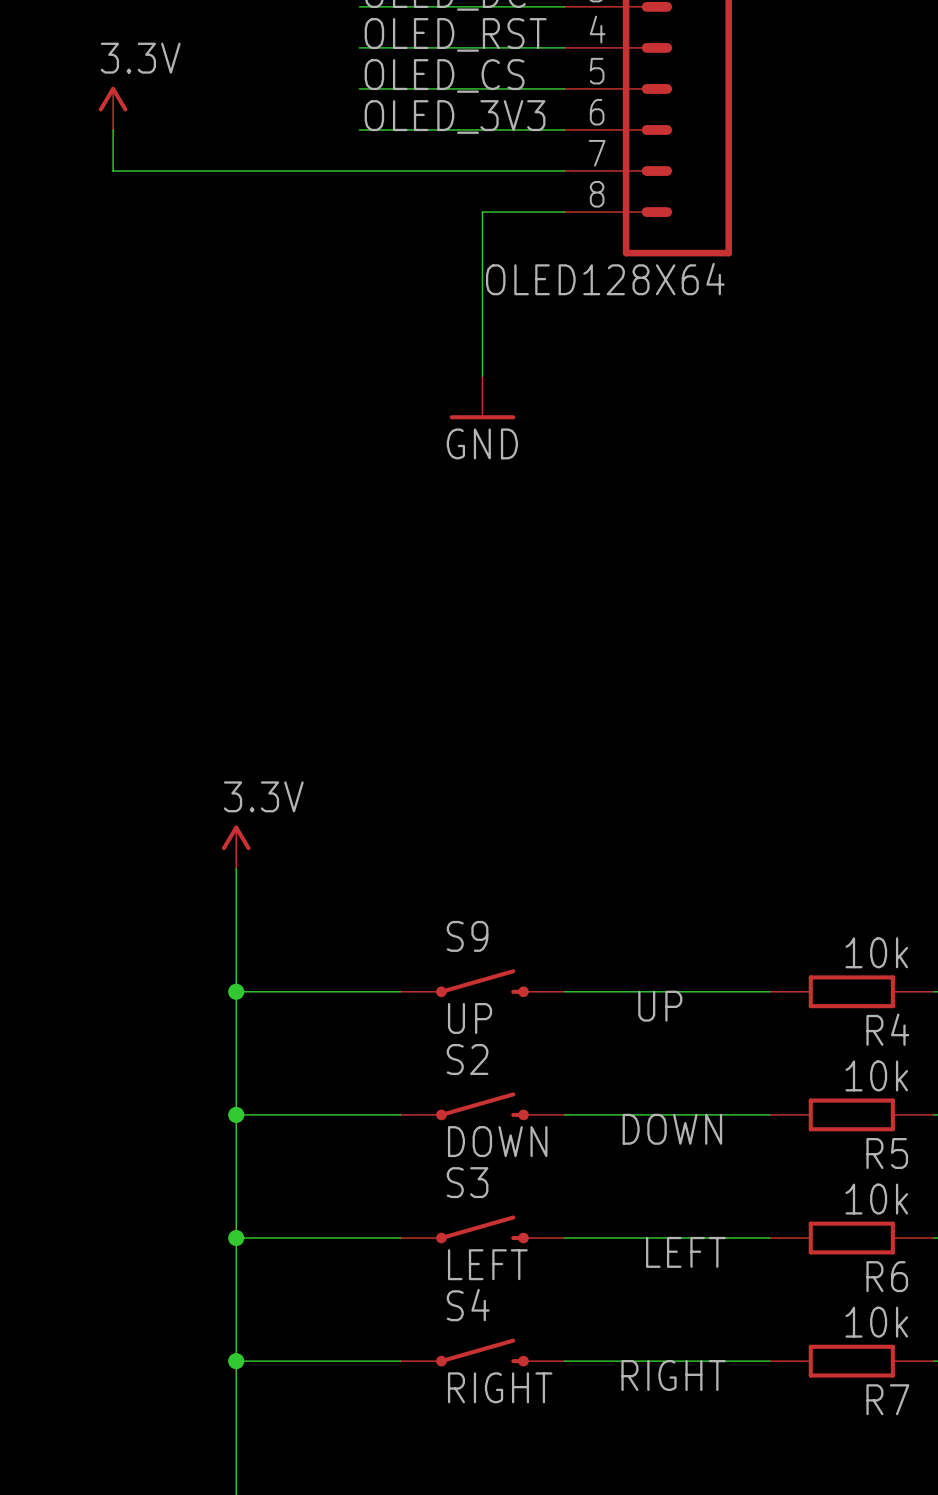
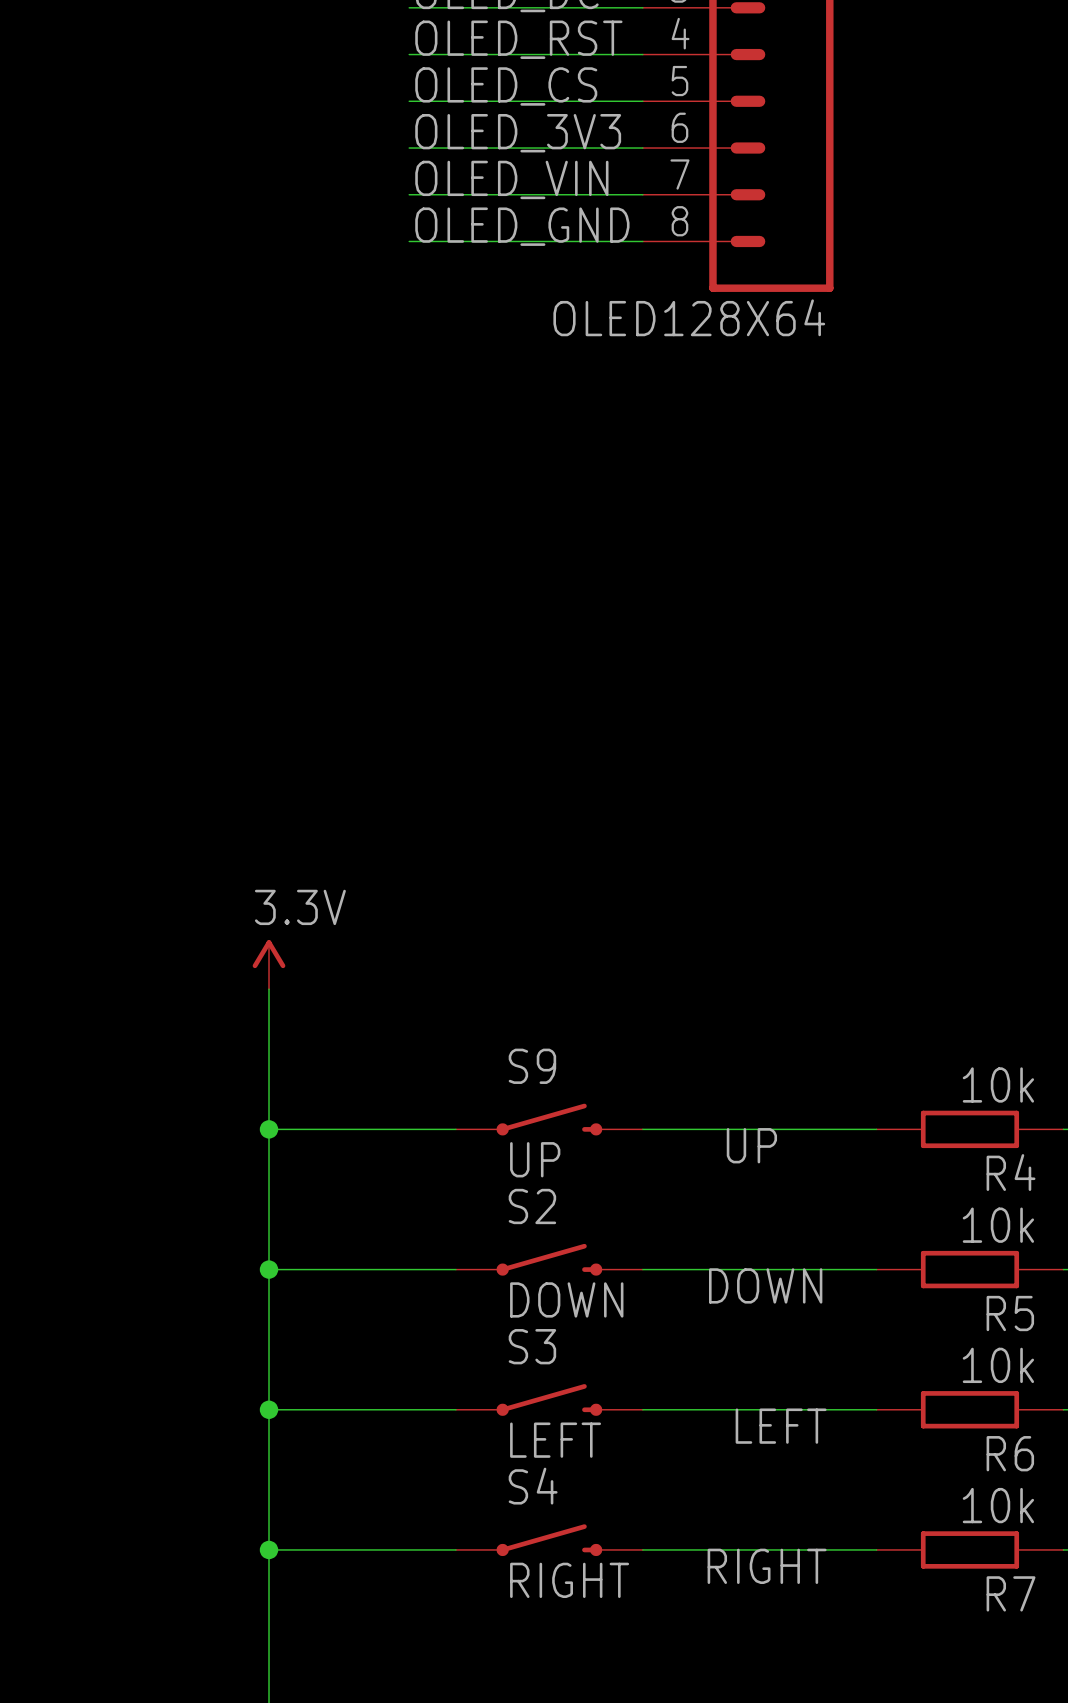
power symbol: 3.3V (113, 108) -> none
wire: (113, 129) (113, 171) (359, 171) -> none
label: none -> OLED_VIN (511, 179)
label: none -> OLED_GND (522, 226)
wire: (482, 212) (482, 376) -> (549, 241) (409, 241)
power symbol: GND (482, 397) -> none

